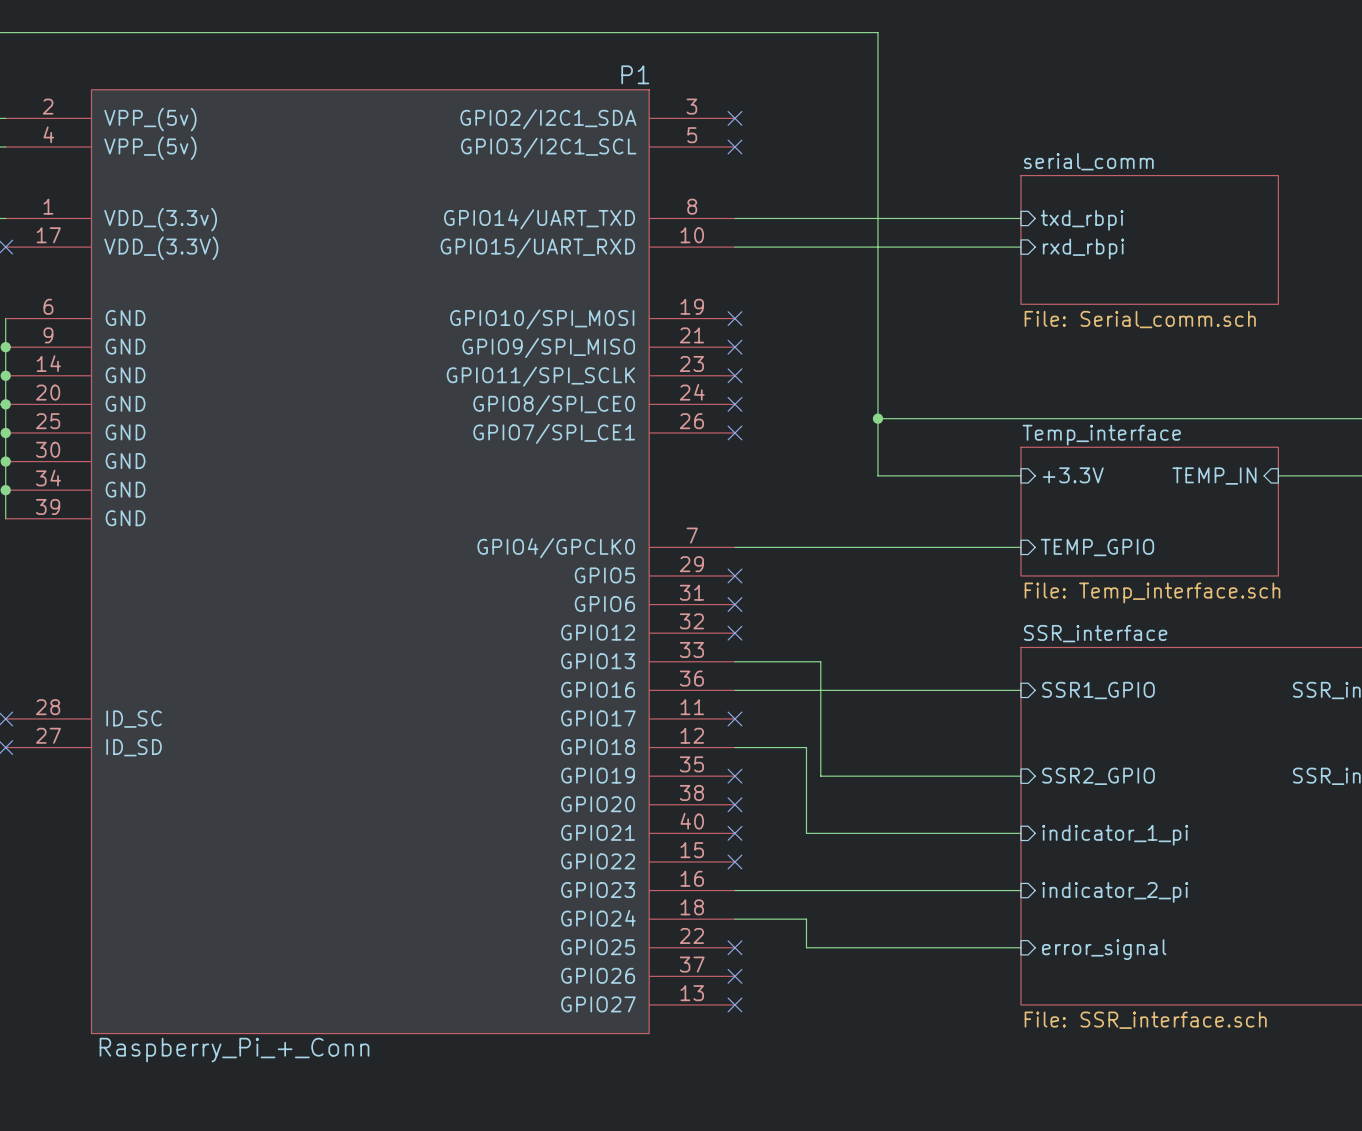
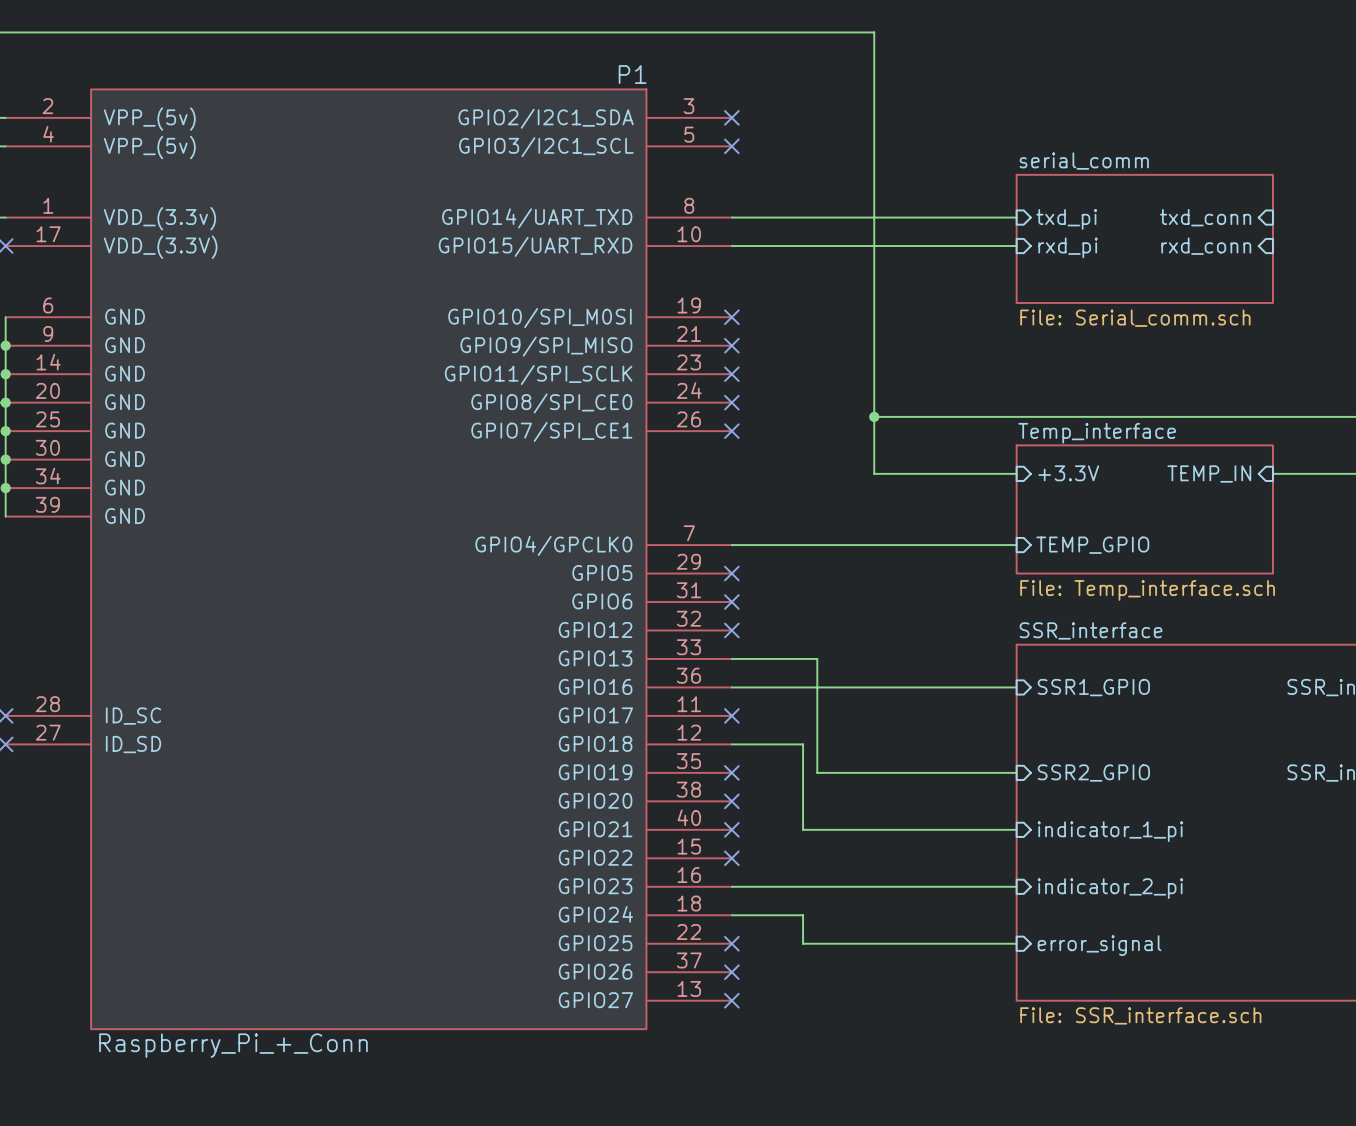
sheet pin: none -> txd_conn (1205, 217)
sheet pin: txd_rbpi (1082, 220) -> txd_pi (1066, 219)
sheet pin: none -> rxd_conn (1206, 246)
sheet pin: rxd_rbpi (1083, 248) -> rxd_pi (1068, 247)

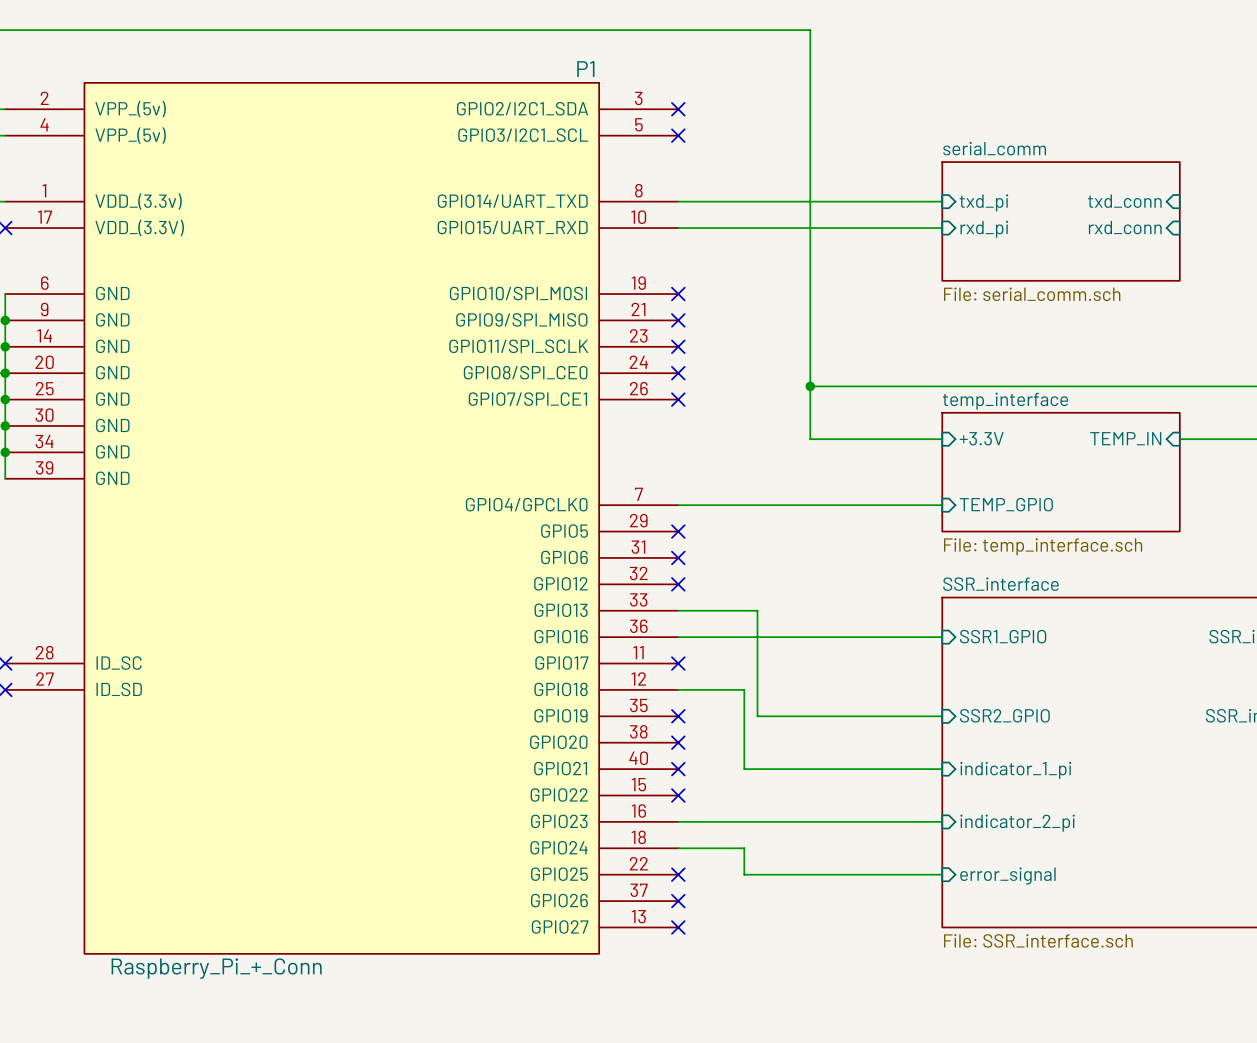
sheet serial_comm value: File: Serial_comm.sch (1135, 318) -> File: serial_comm.sch (1032, 294)
sheet Temp_interface name: Temp_interface (1097, 433) -> temp_interface (1005, 401)
sheet Temp_interface value: File: Temp_interface.sch (1147, 590) -> File: temp_interface.sch (1043, 546)

